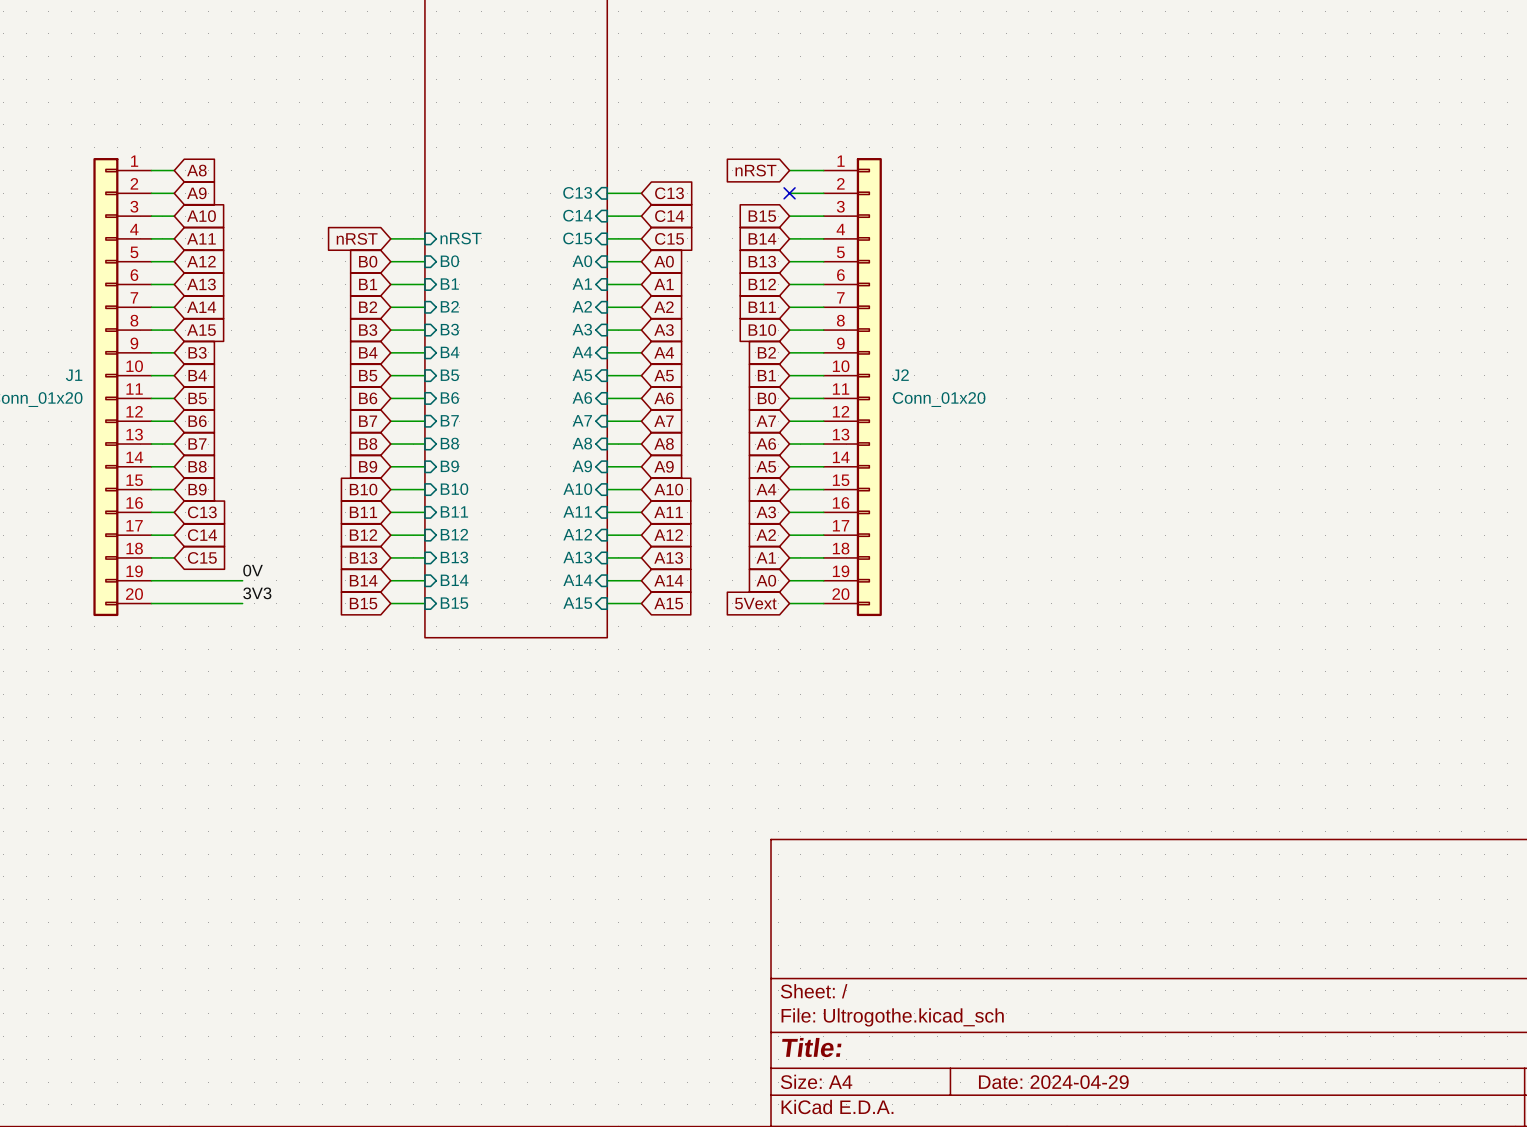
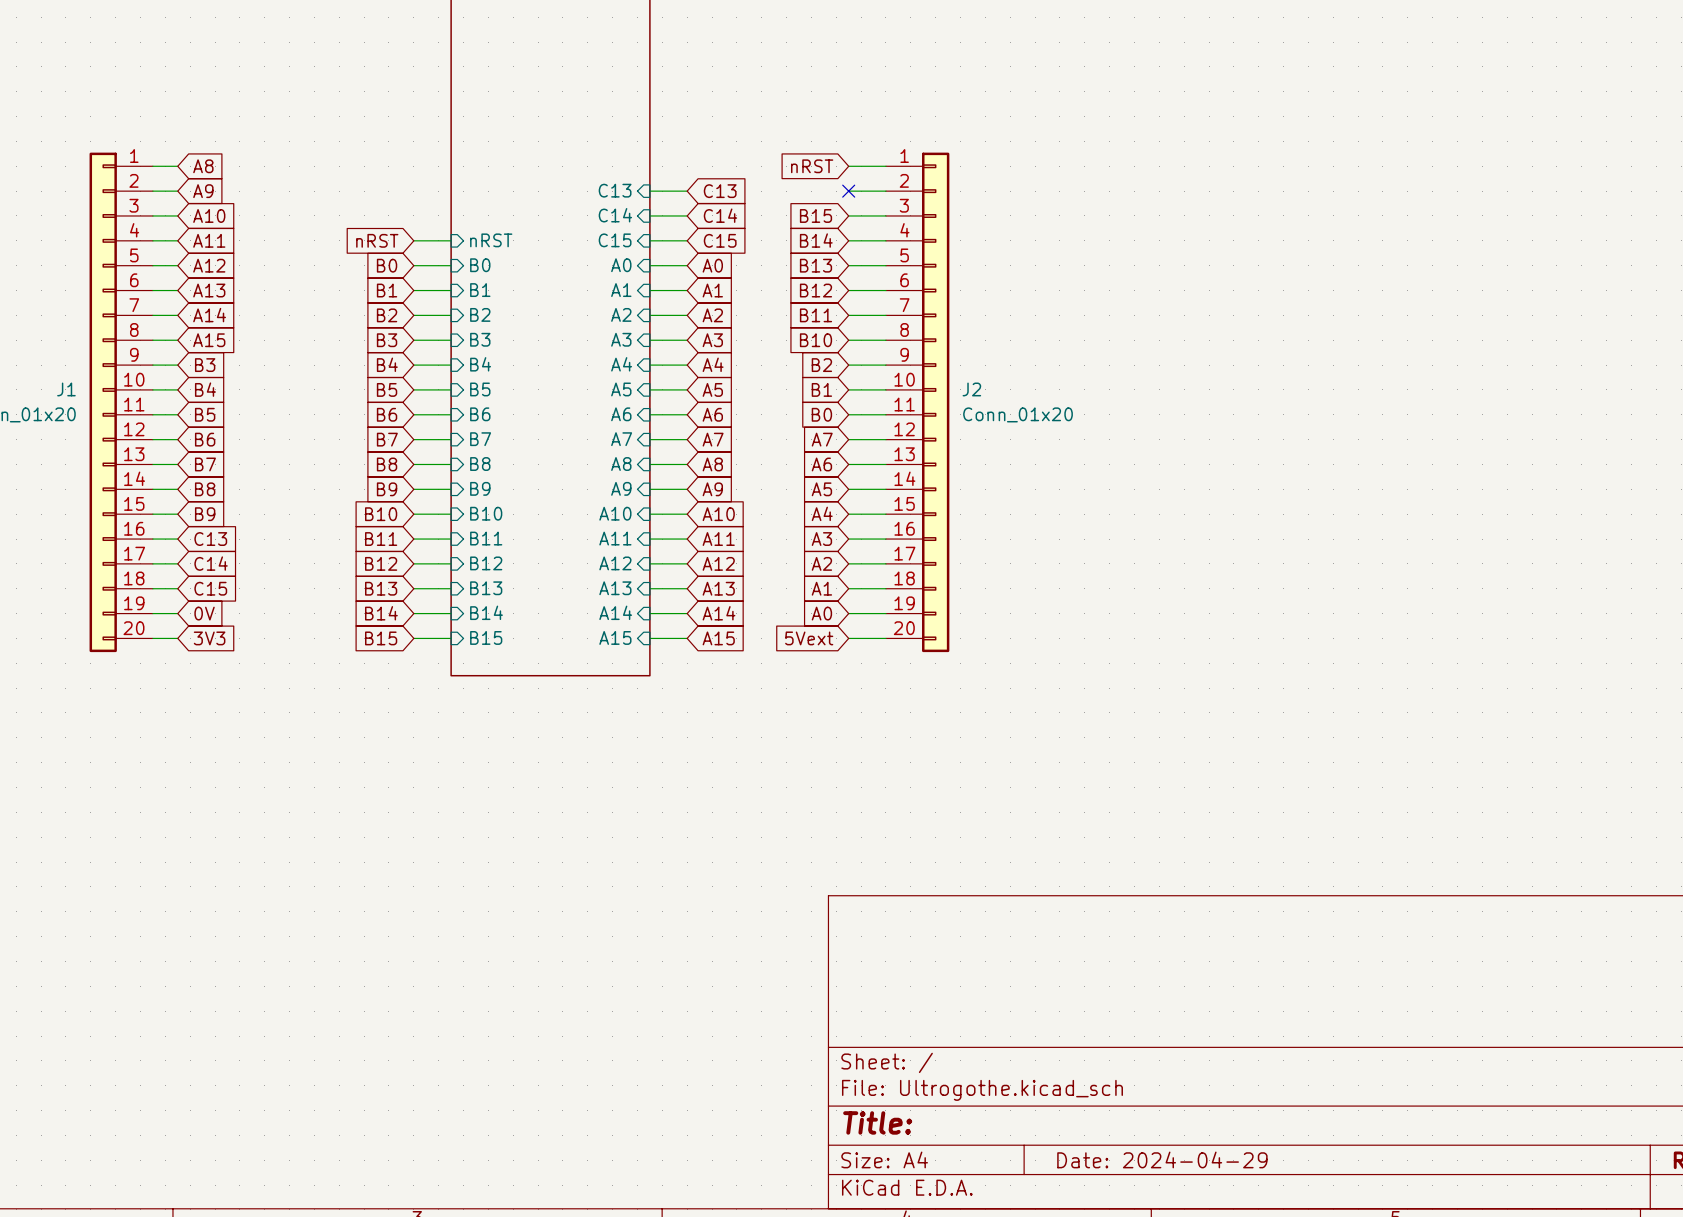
label: 0V (253, 570) -> none
wire: (174, 580) (242, 580) -> none
global label: none -> 0V (204, 613)
label: 3V3 (257, 593) -> none
wire: (174, 603) (242, 603) -> none
global label: none -> 3V3 (209, 638)

